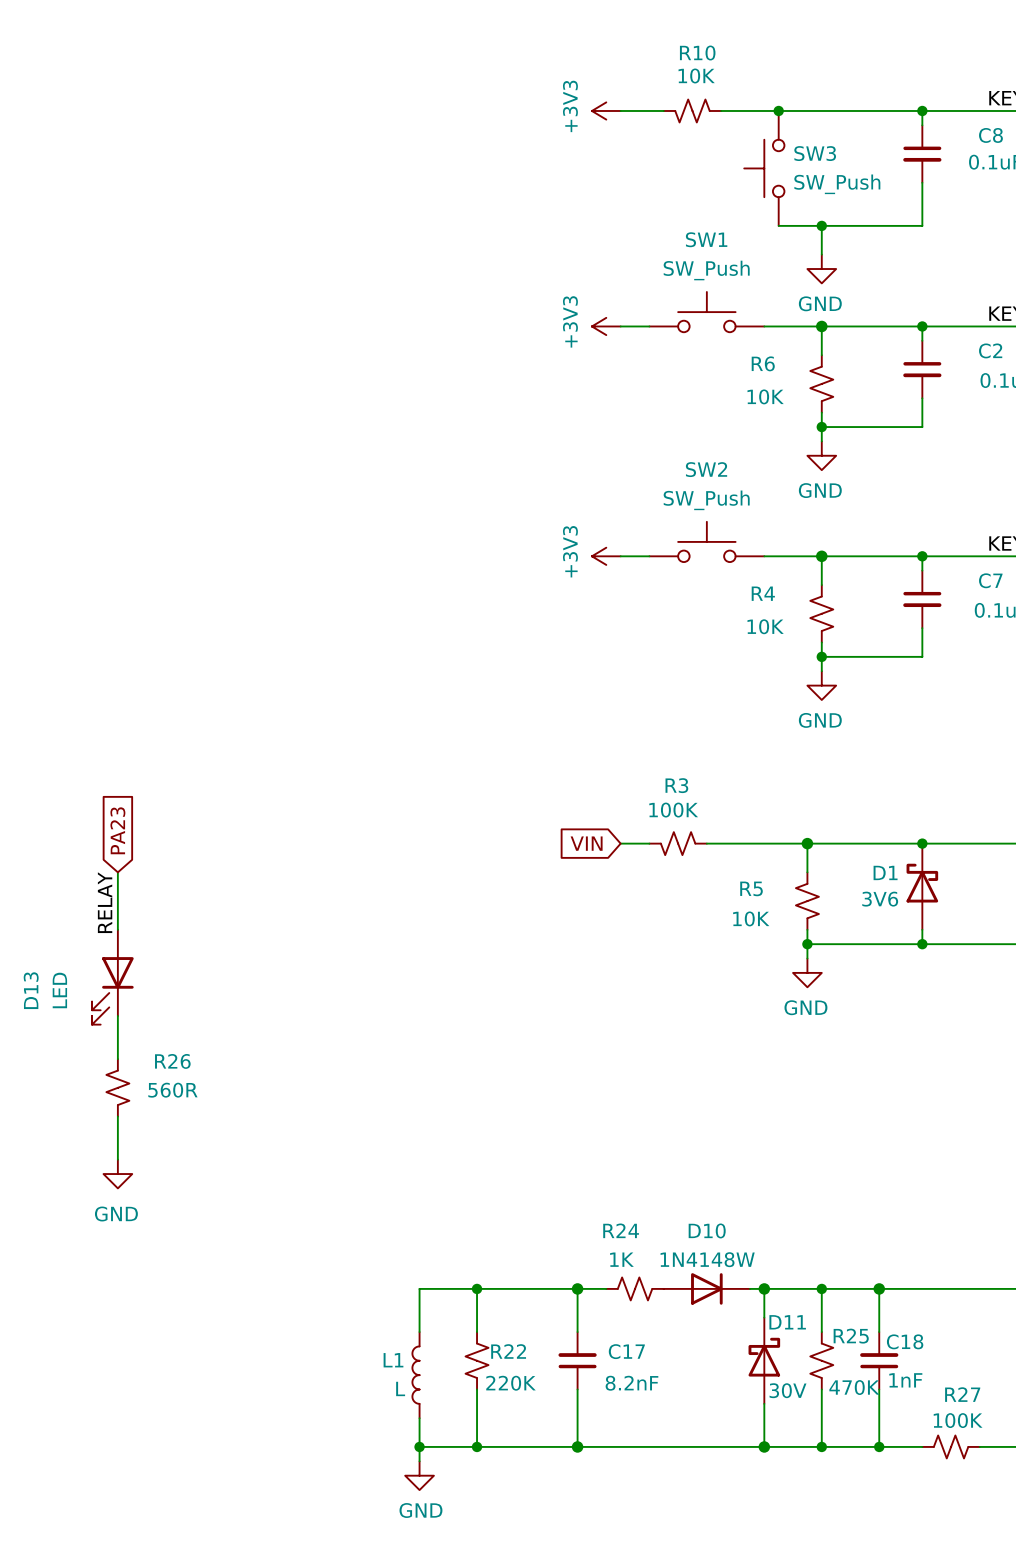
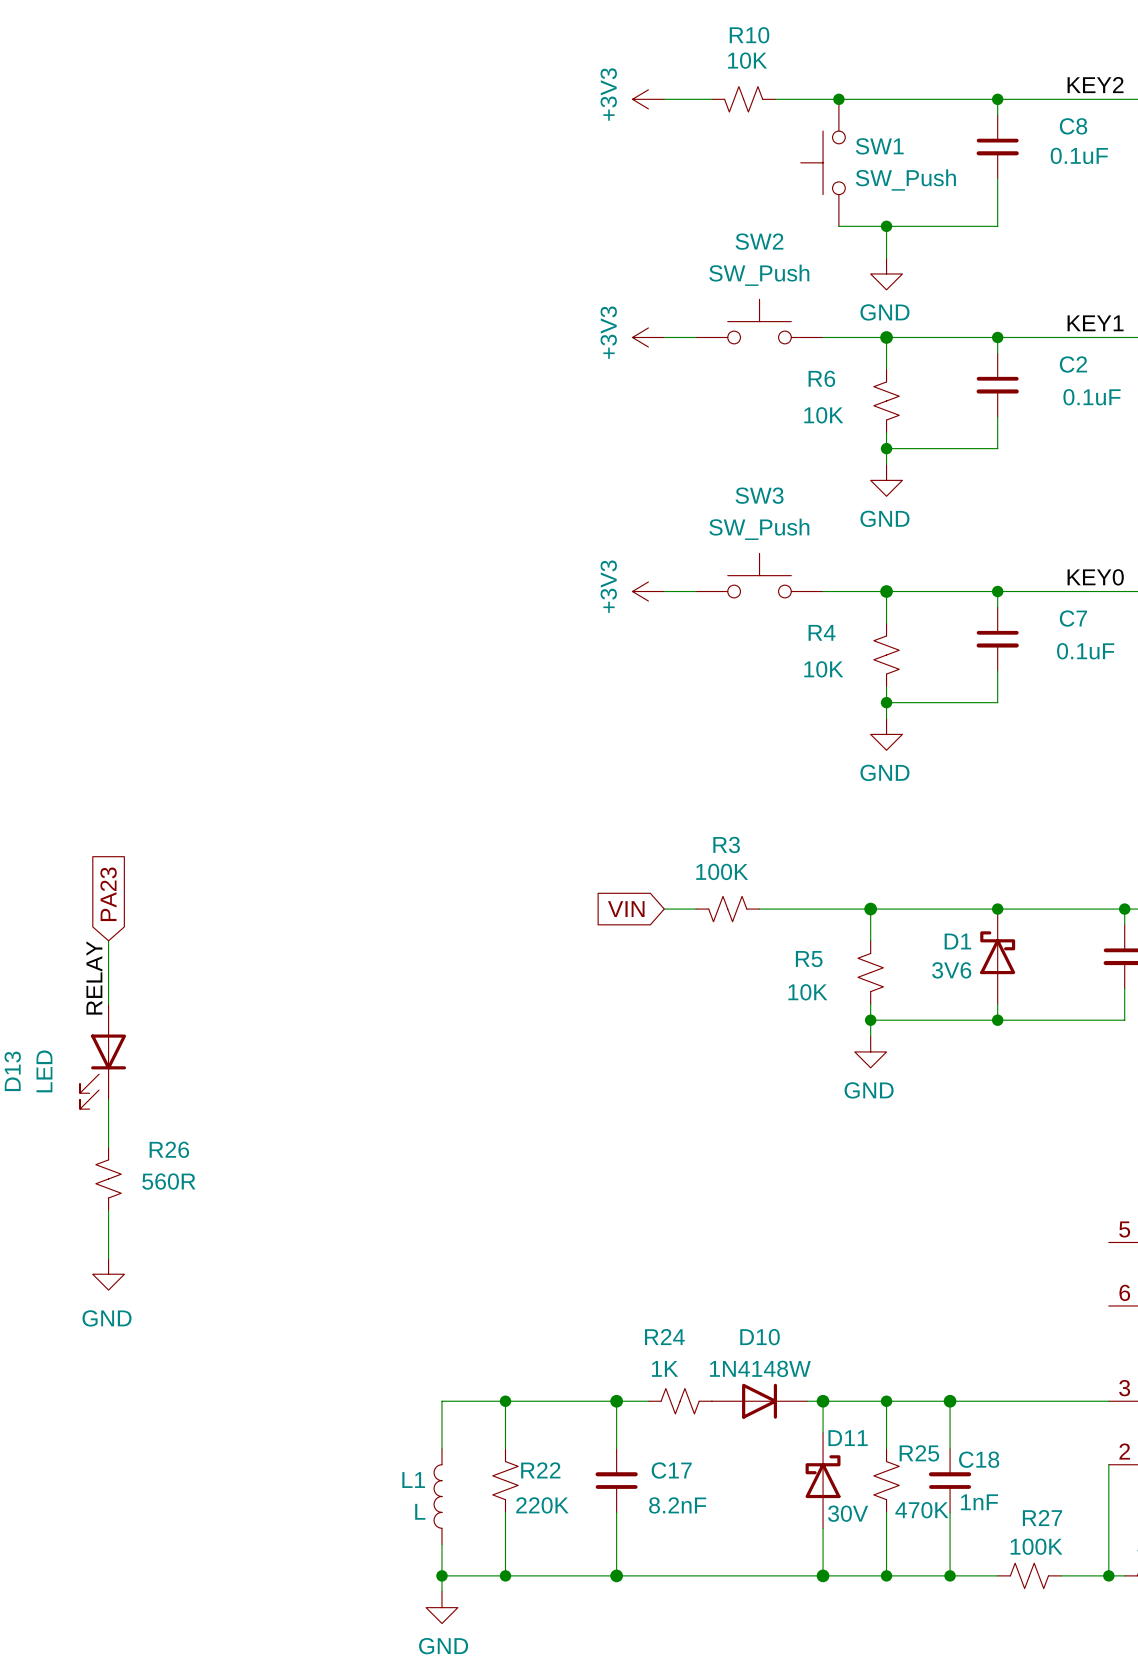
SW3 name: SW3 (815, 153) -> SW1 (879, 146)
SW1 name: SW1 (706, 239) -> SW2 (759, 241)
SW2 name: SW2 (706, 469) -> SW3 (759, 495)

